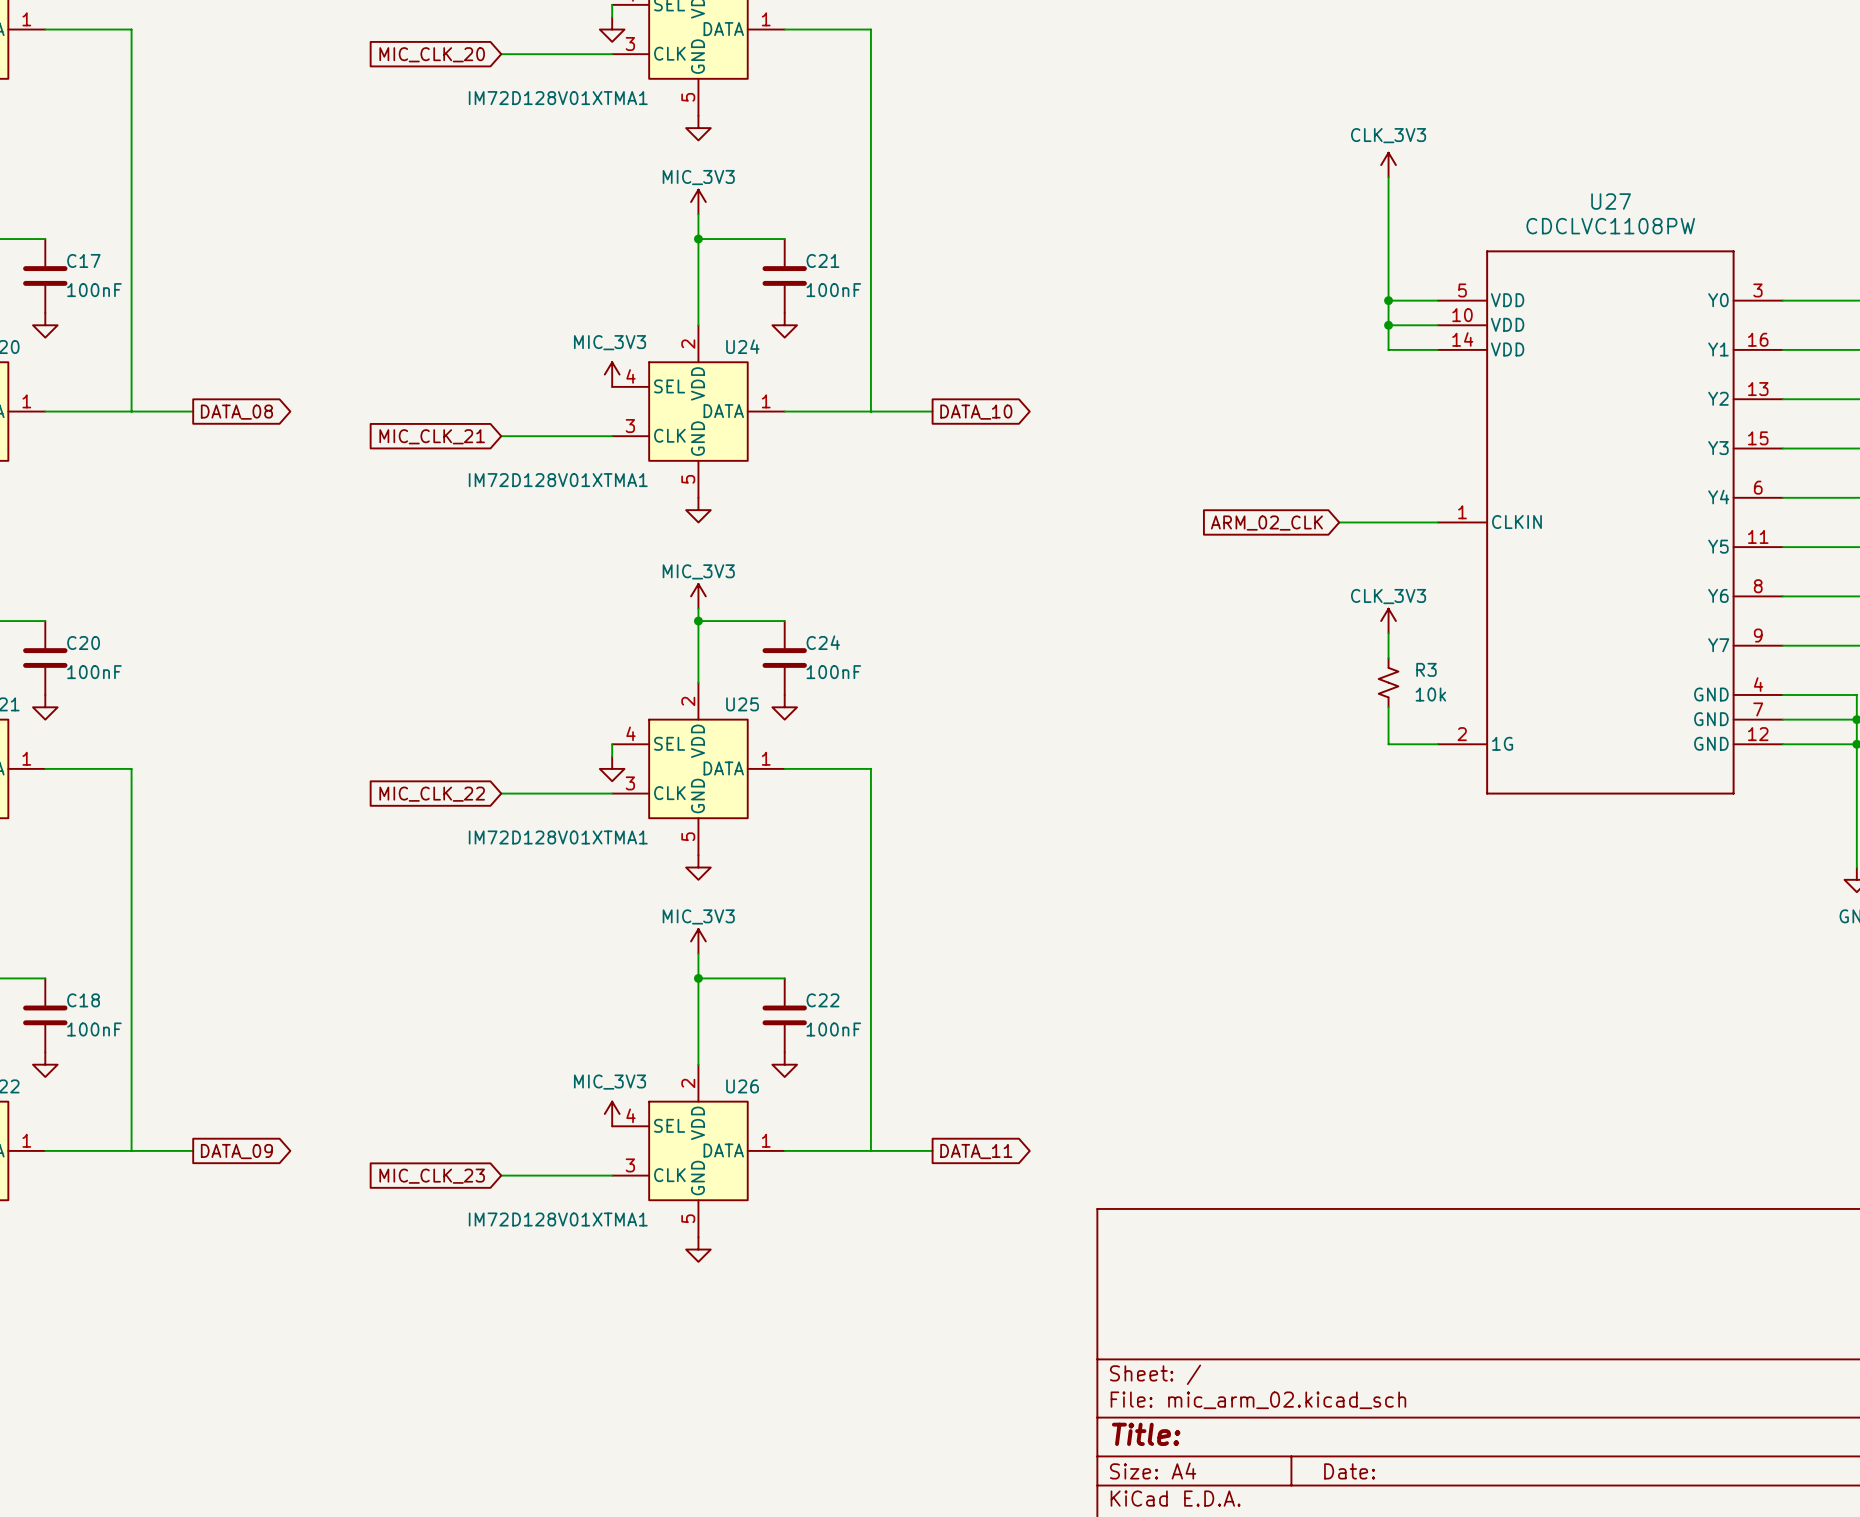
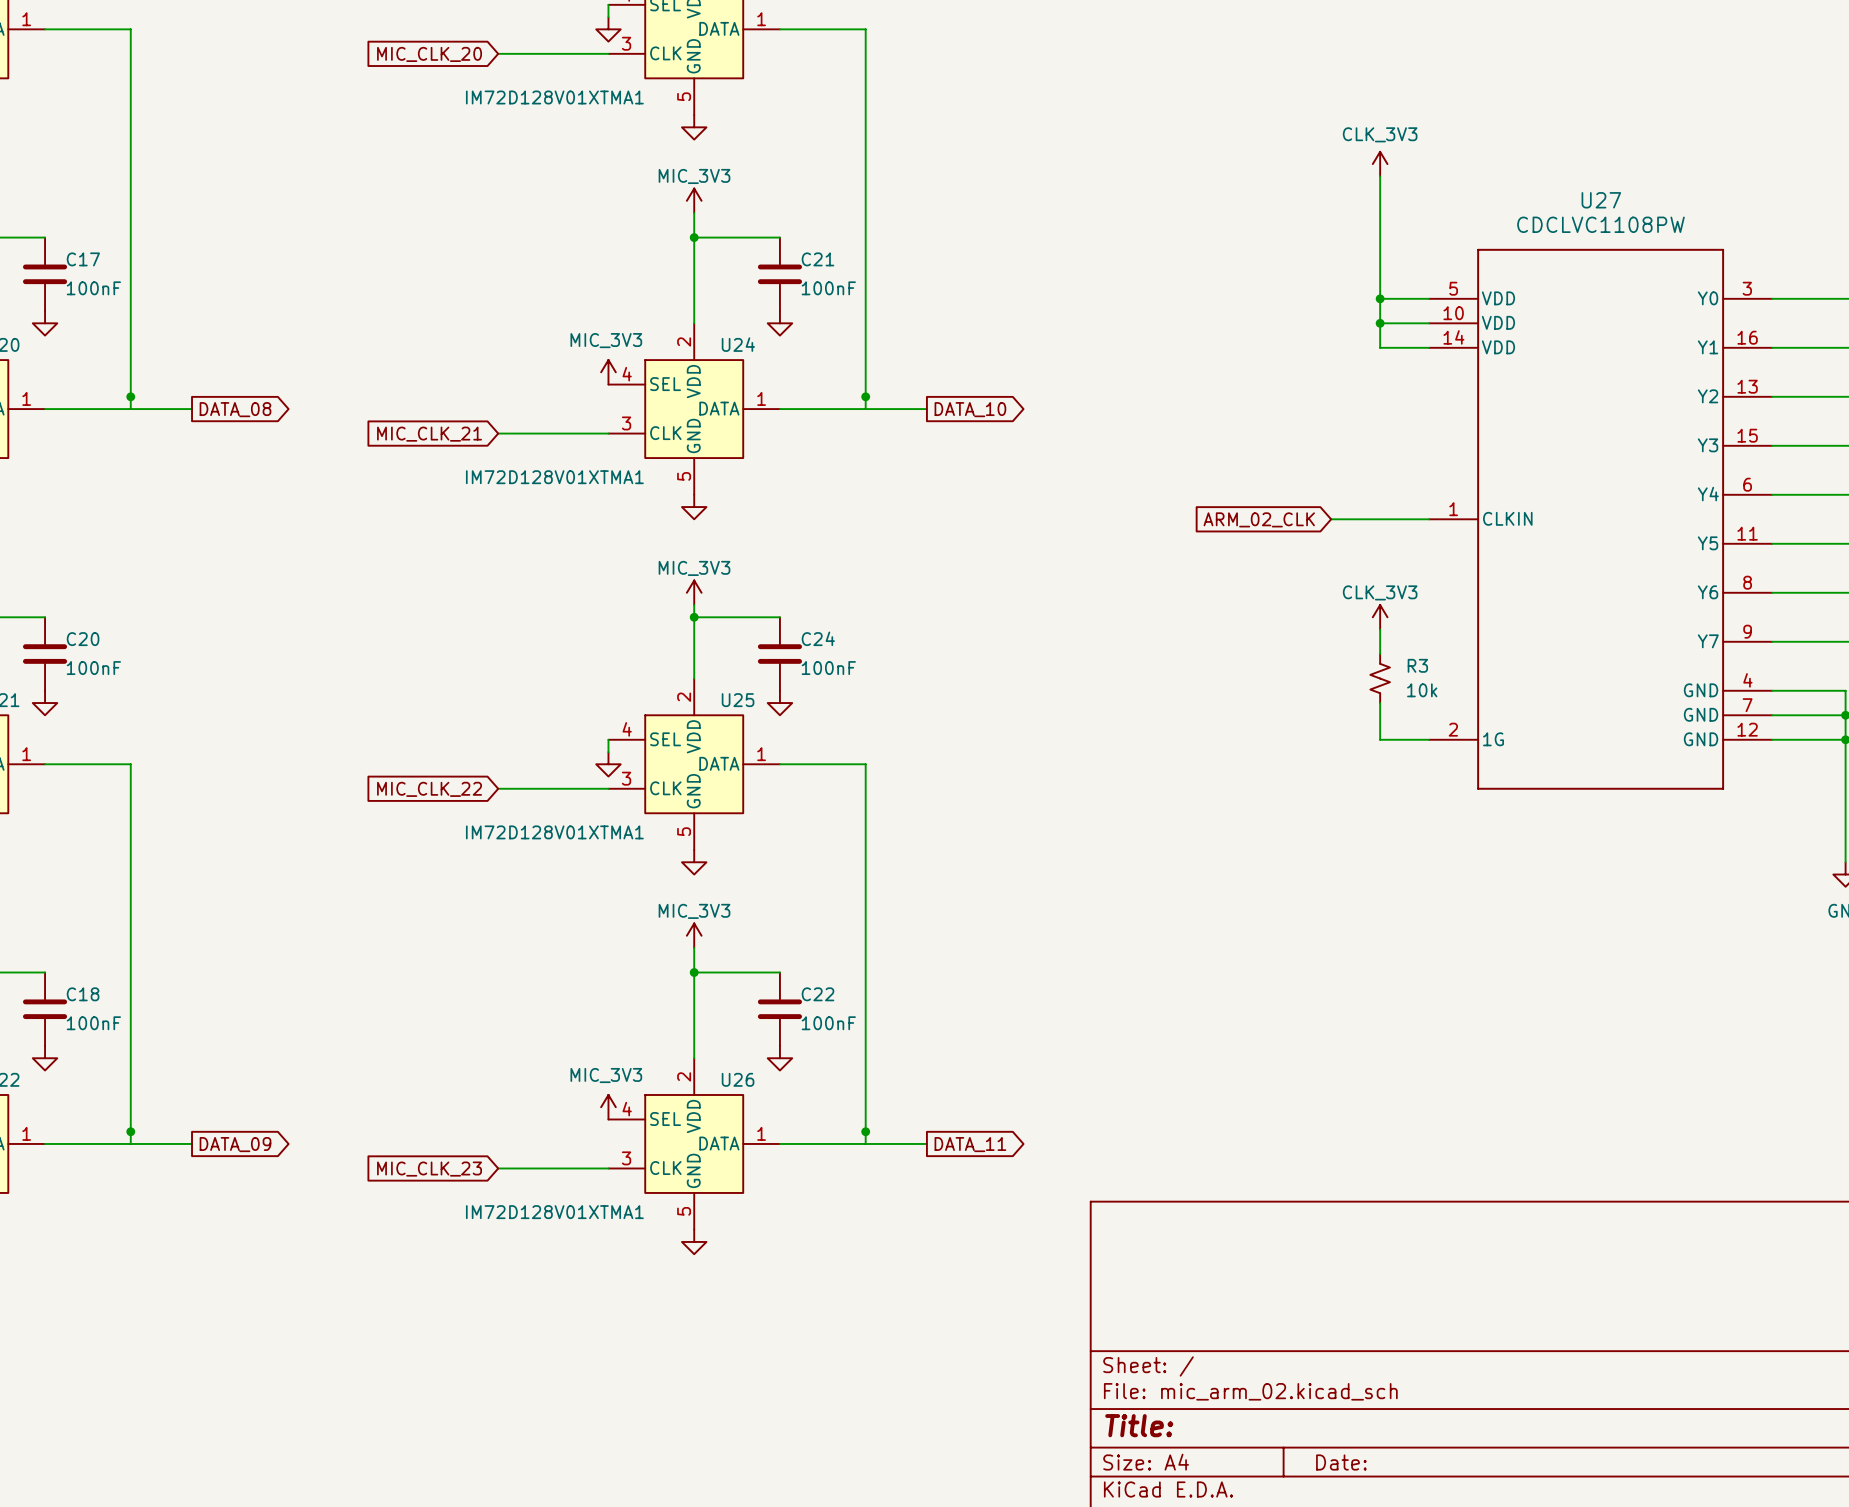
junction: none -> (130, 396)
junction: none -> (865, 396)
junction: none -> (130, 1131)
junction: none -> (865, 1131)

